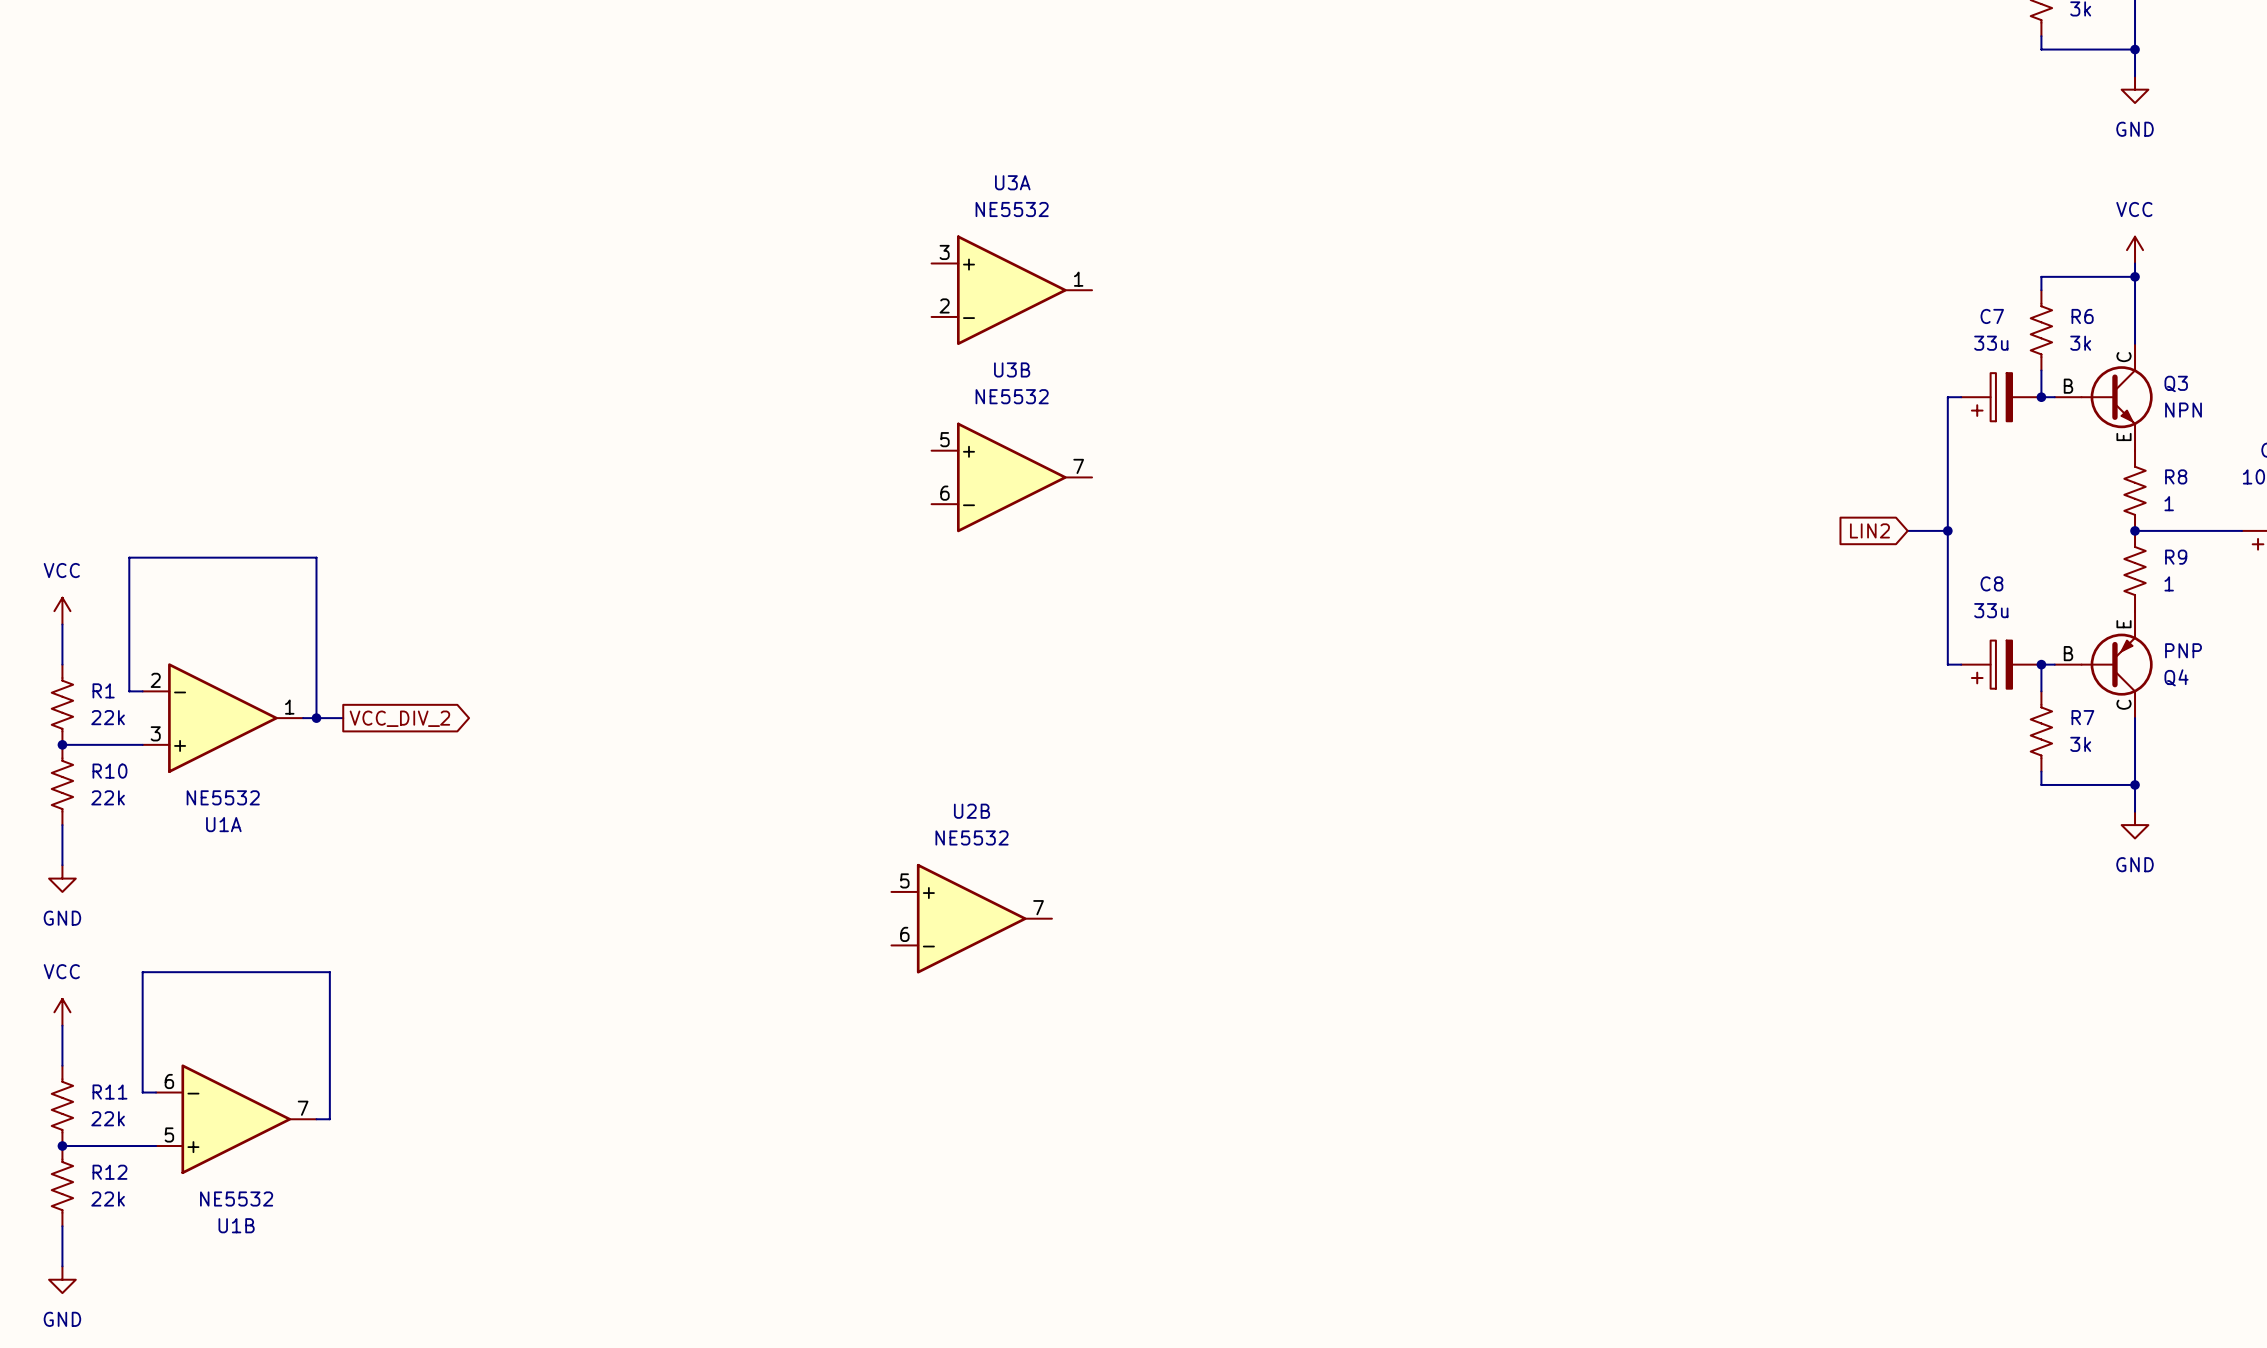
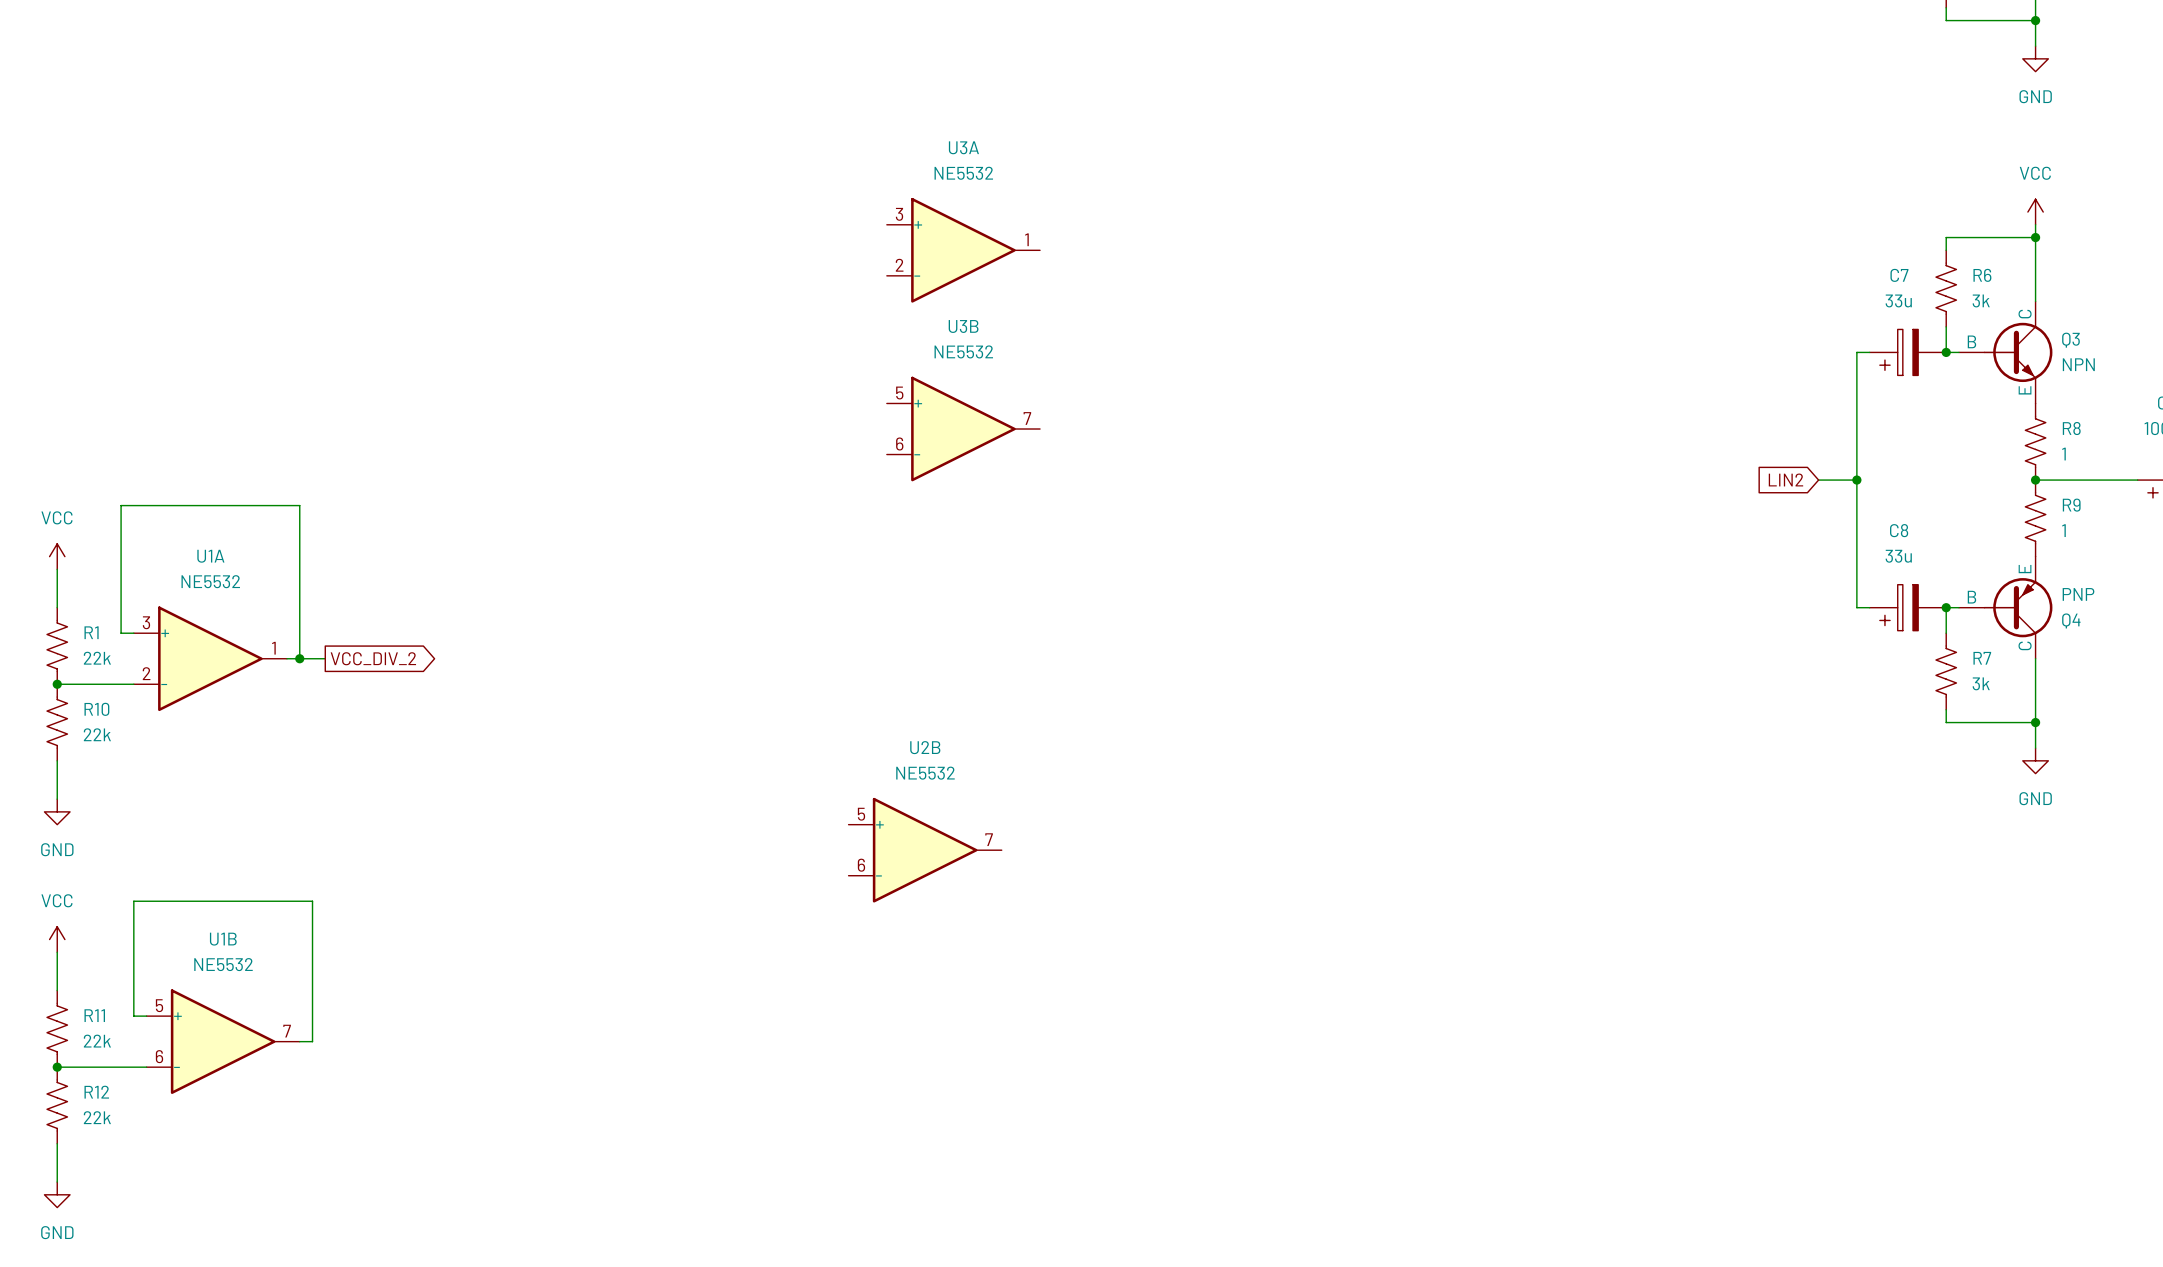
U1A flip: as is (222, 718) -> up-down (210, 658)
U1B flip: as is (236, 1119) -> up-down (223, 1041)

